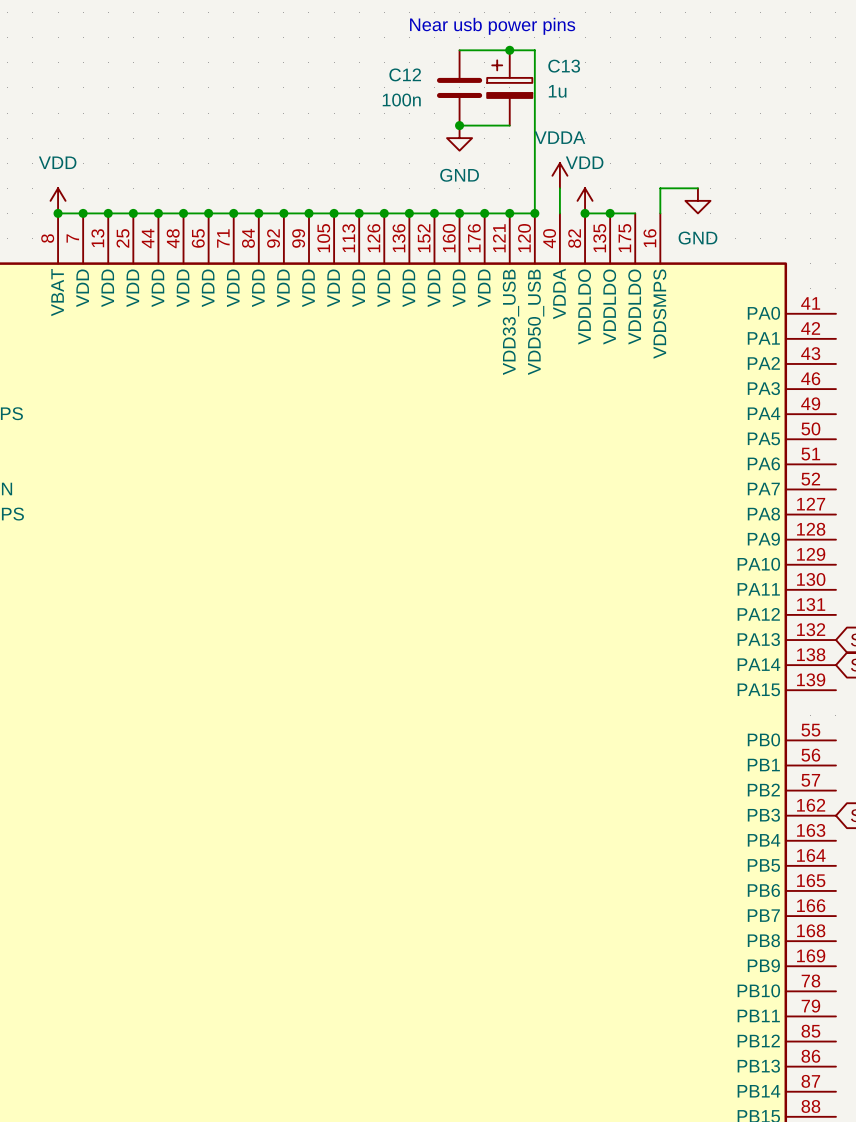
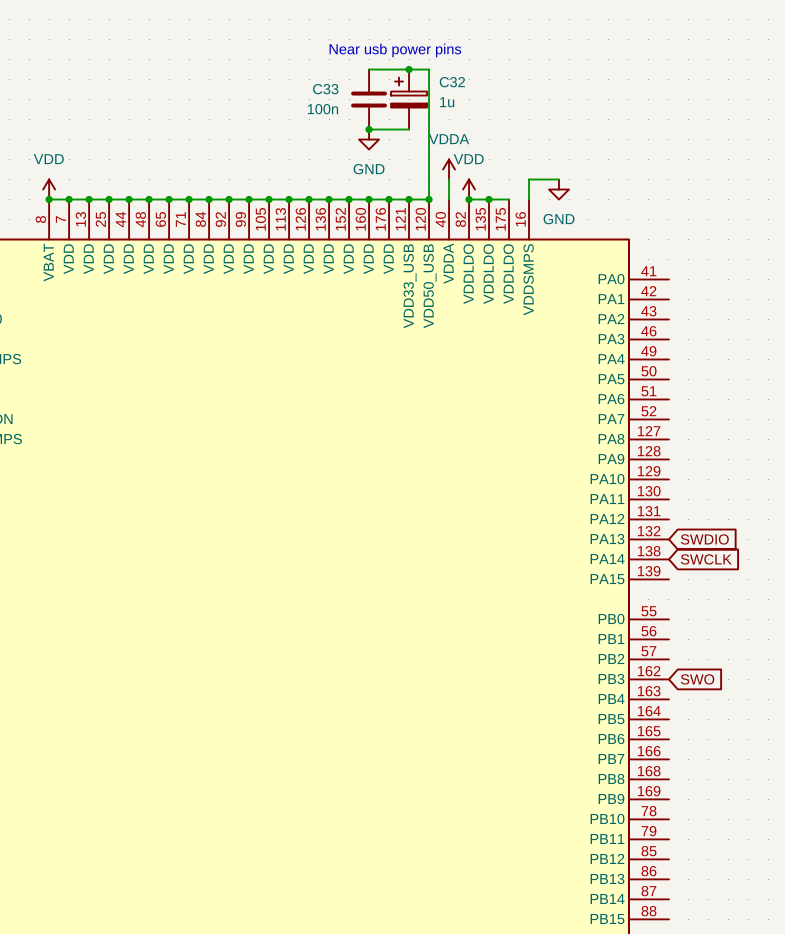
C13 name: C13 (564, 66) -> C32 (452, 82)
C12 name: C12 (405, 74) -> C33 (325, 89)

